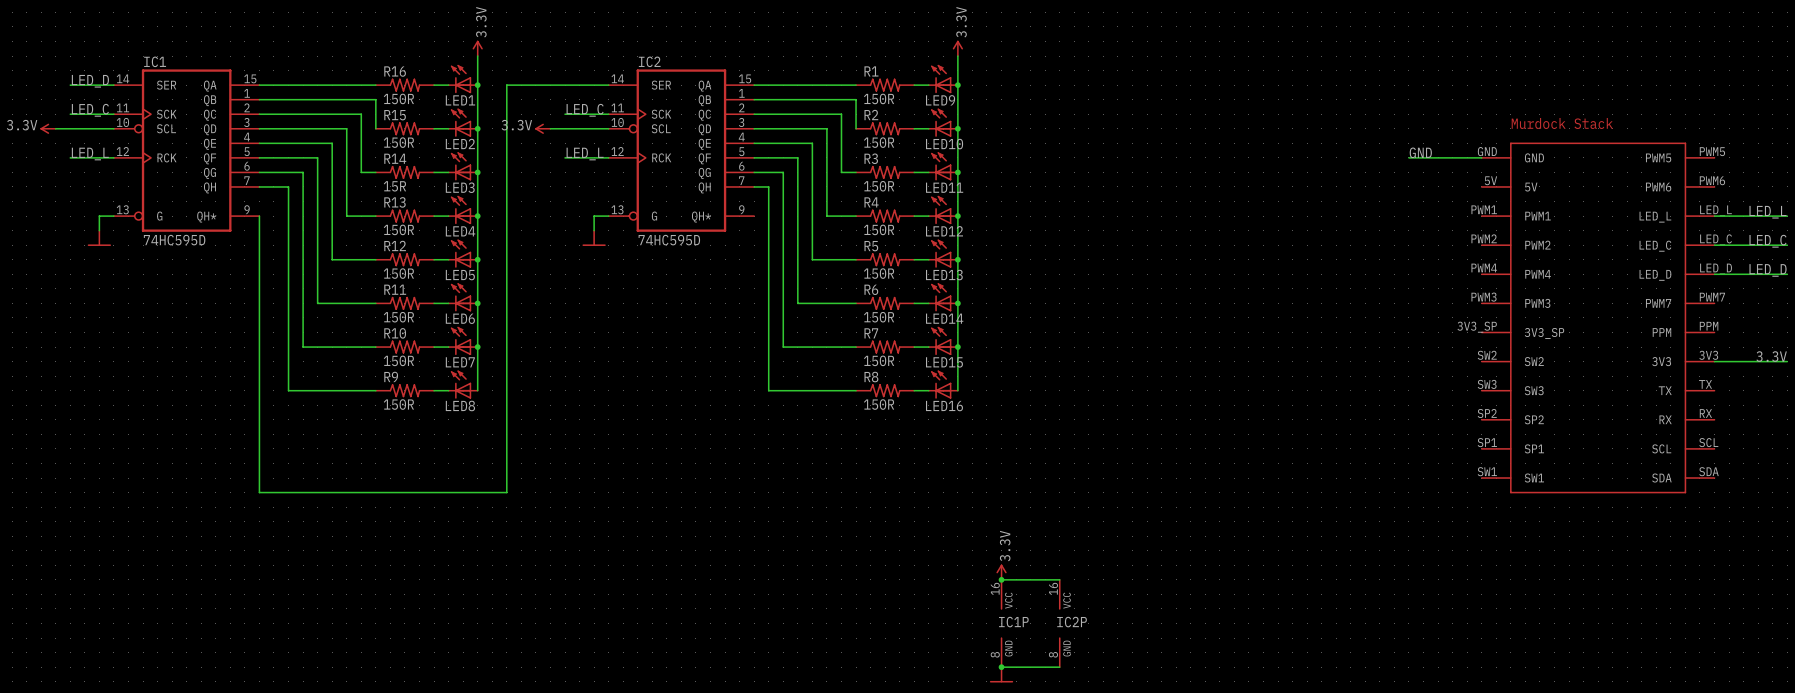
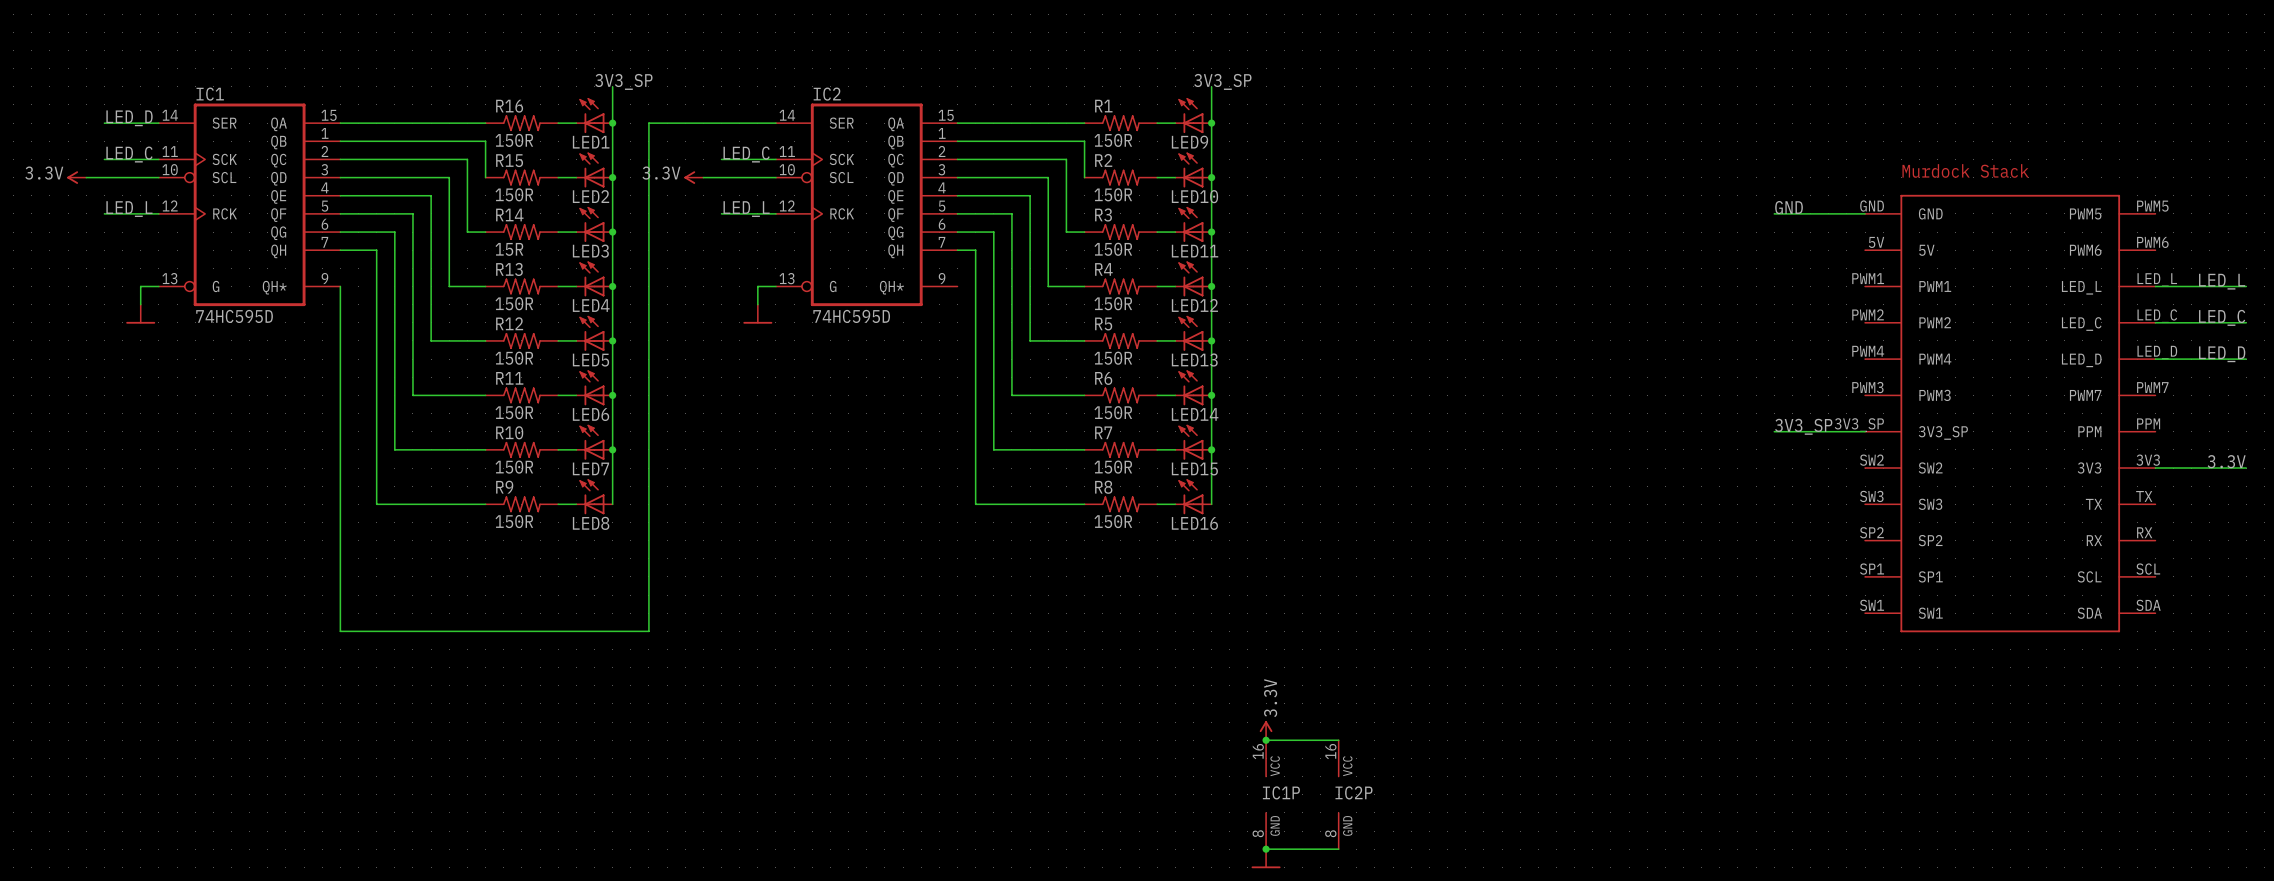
power symbol: 3.3V (477, 48) -> none
power symbol: 3.3V (957, 48) -> none
label: none -> 3V3_SP (623, 81)
label: none -> 3V3_SP (1222, 81)
label: none -> 3V3_SP (1803, 426)
wire: none -> (1774, 431) (1865, 431)

